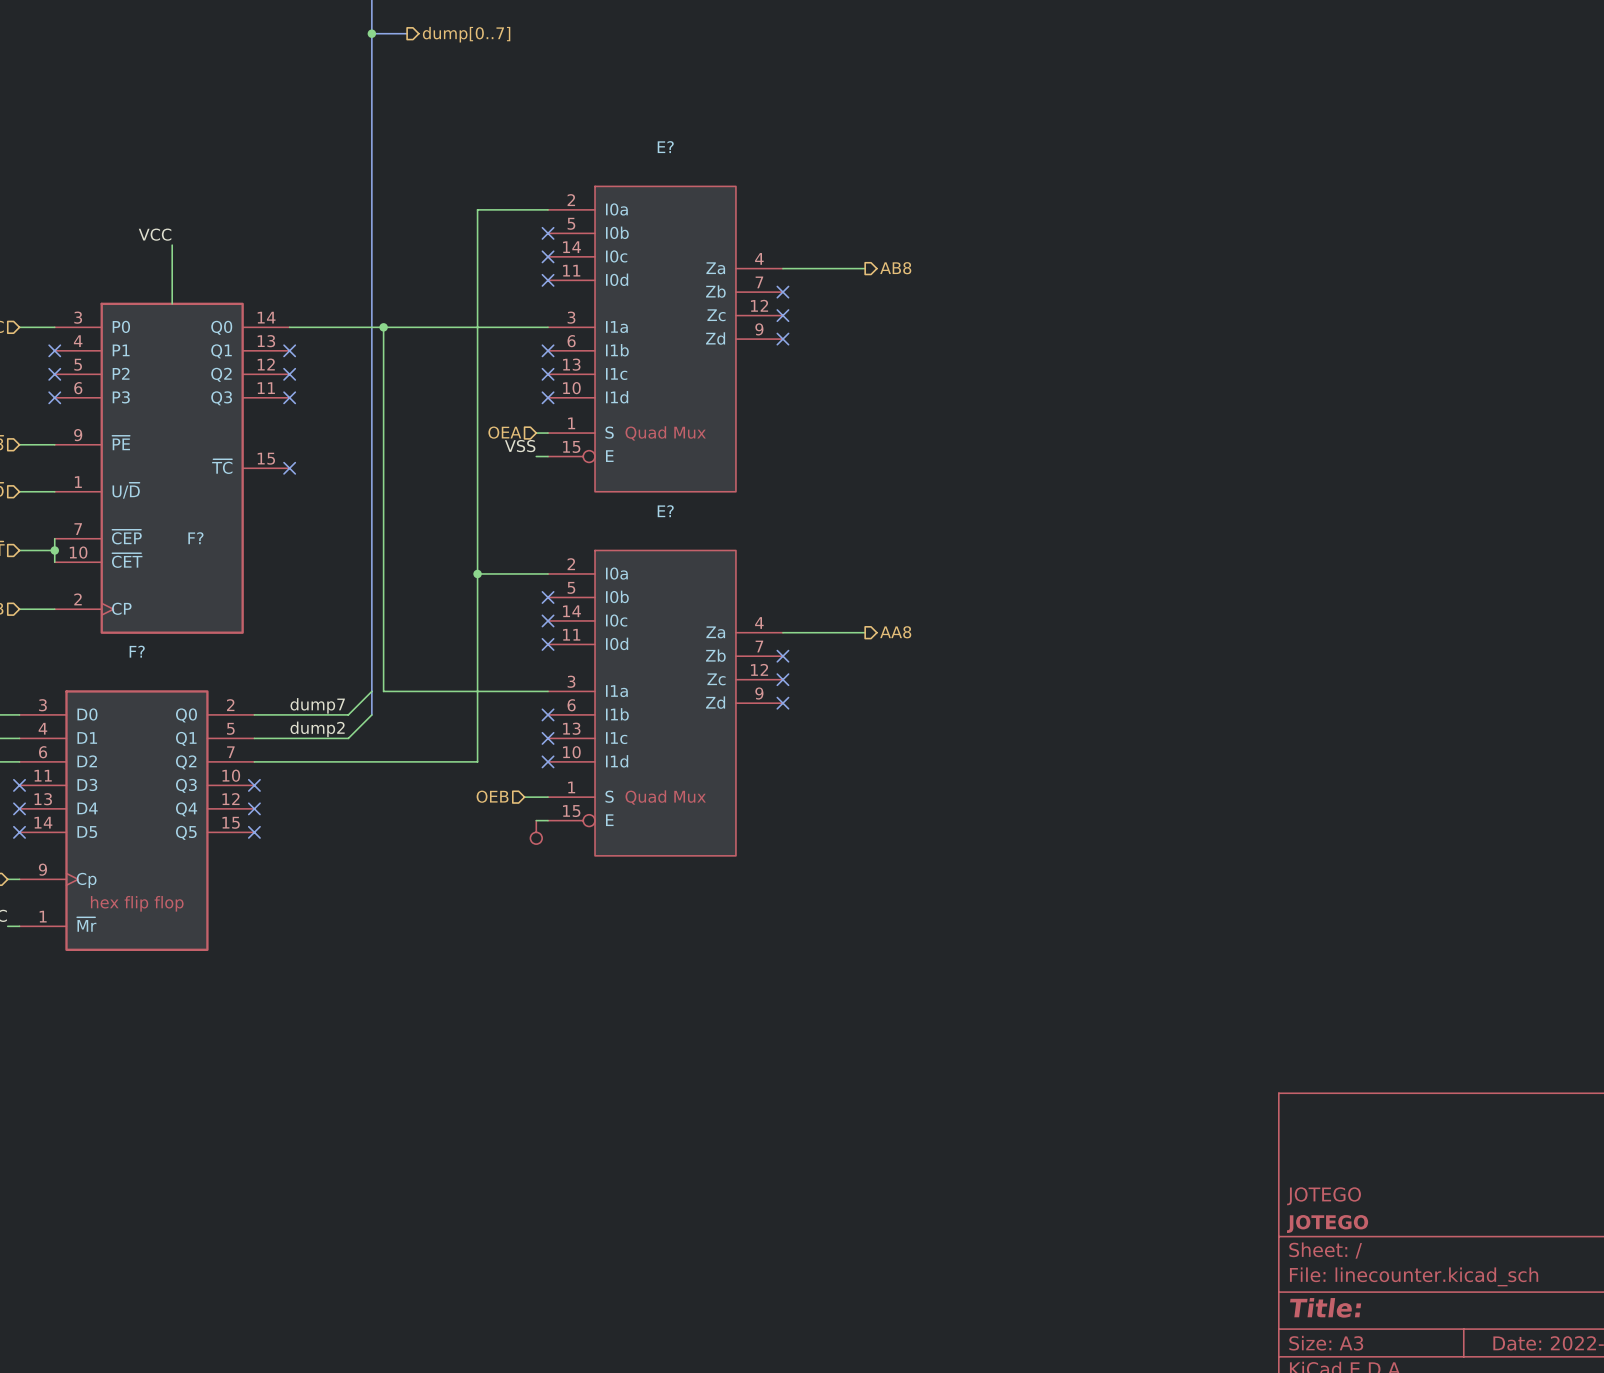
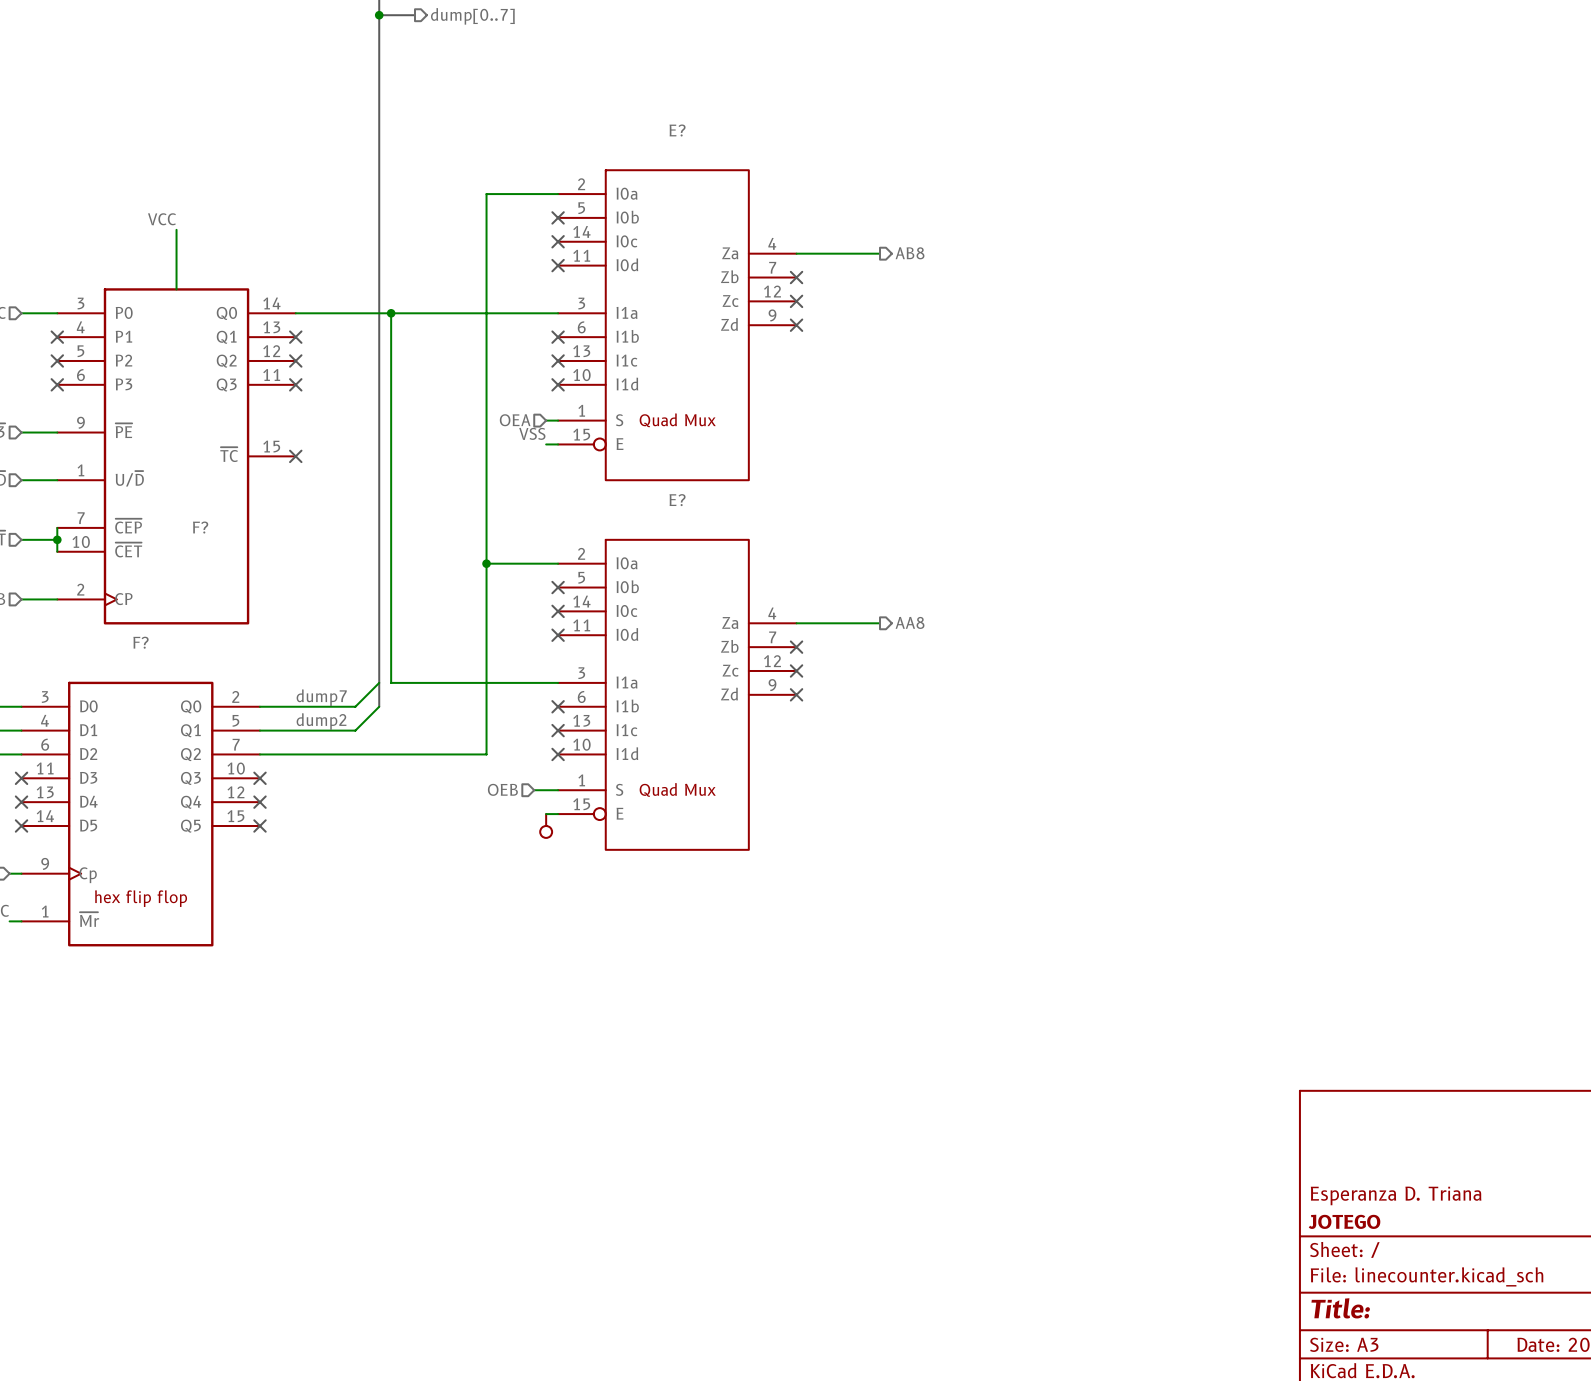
title block: JOTEGO (1324, 1196) -> Esperanza D. Triana (1396, 1195)

